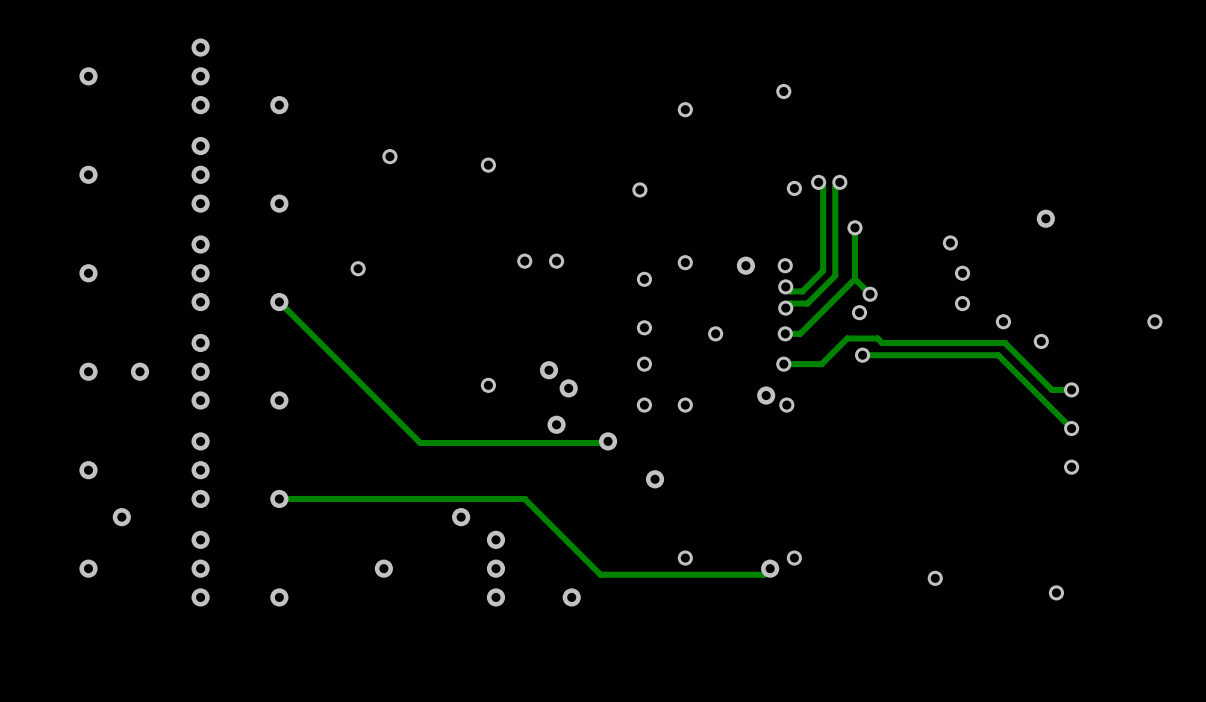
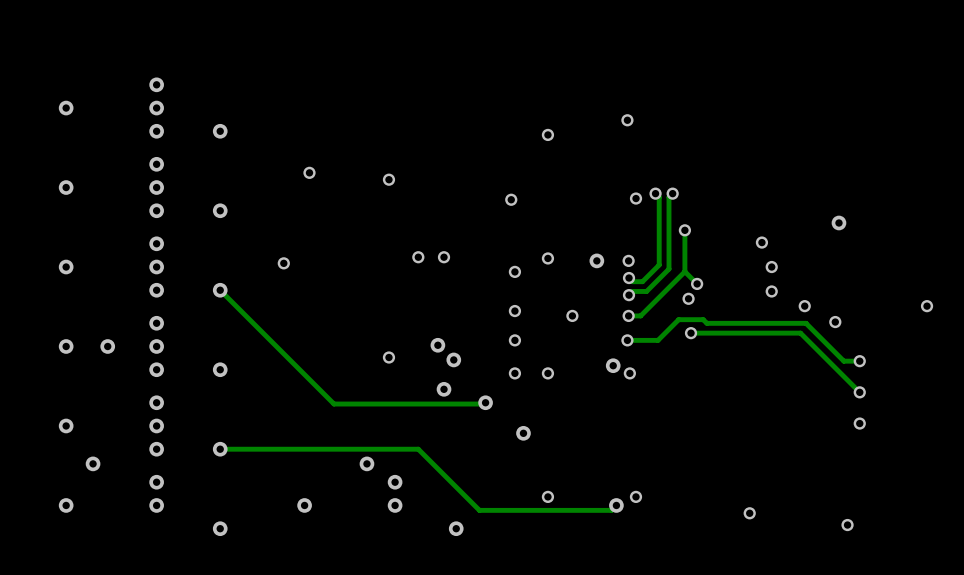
via: (200, 597) -> none
via: (495, 597) -> none

